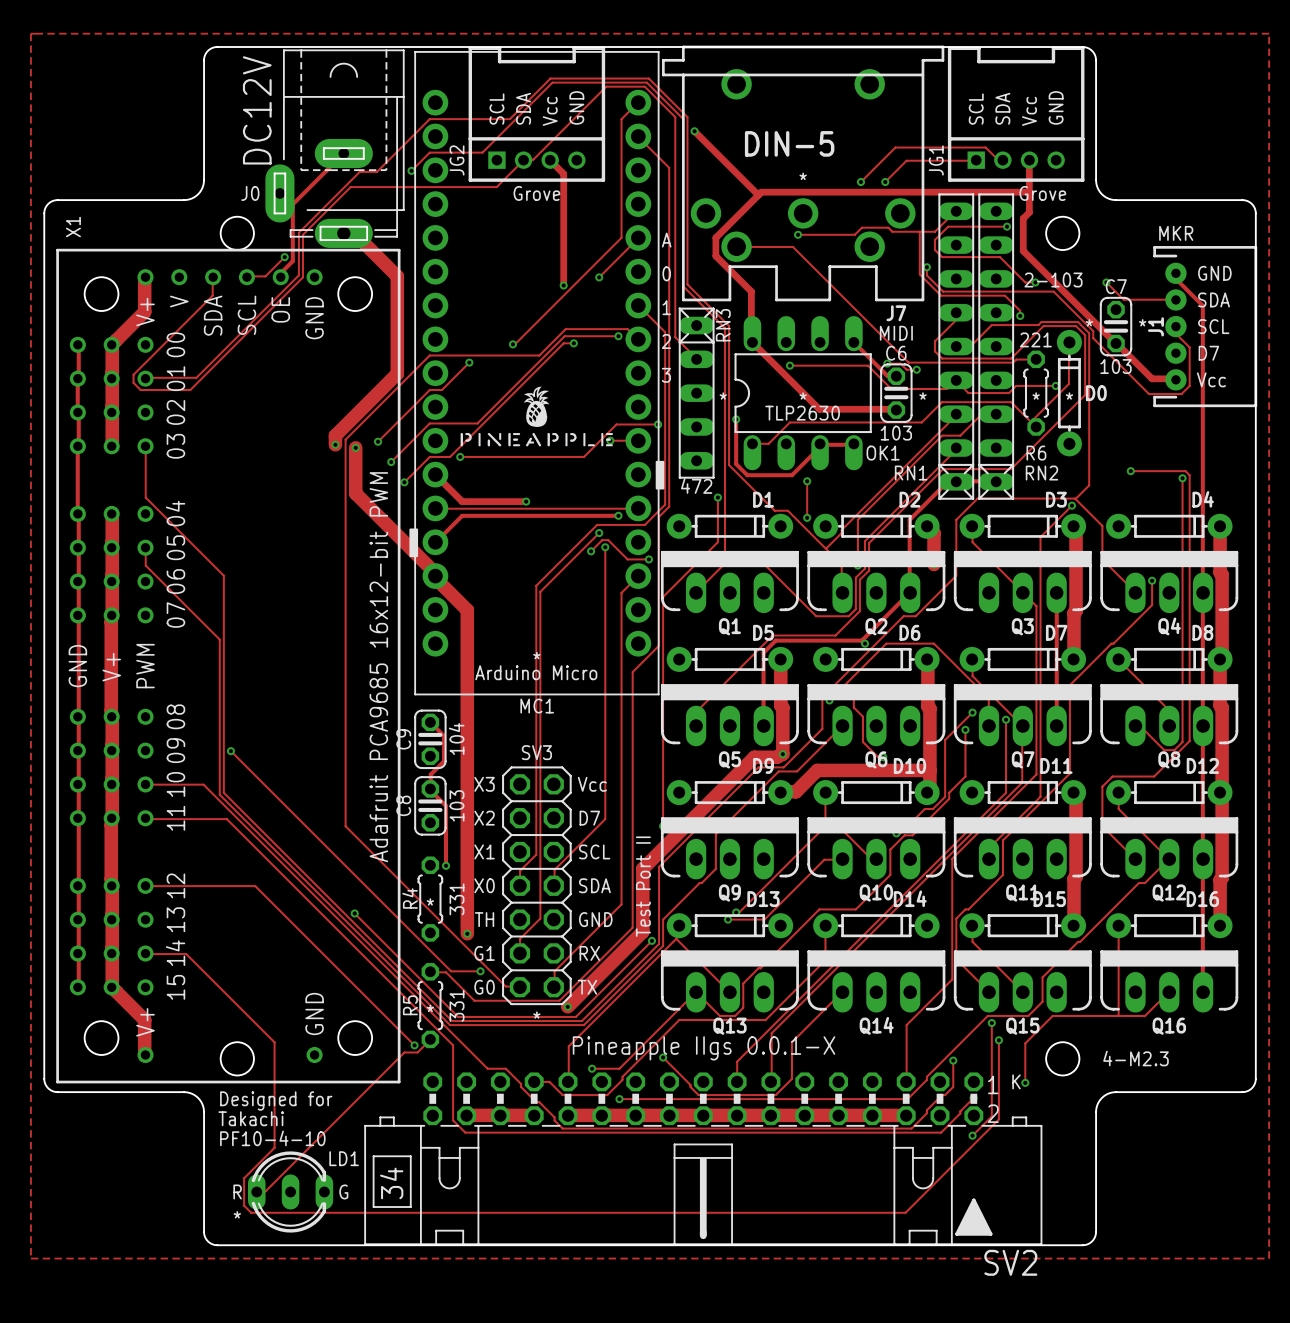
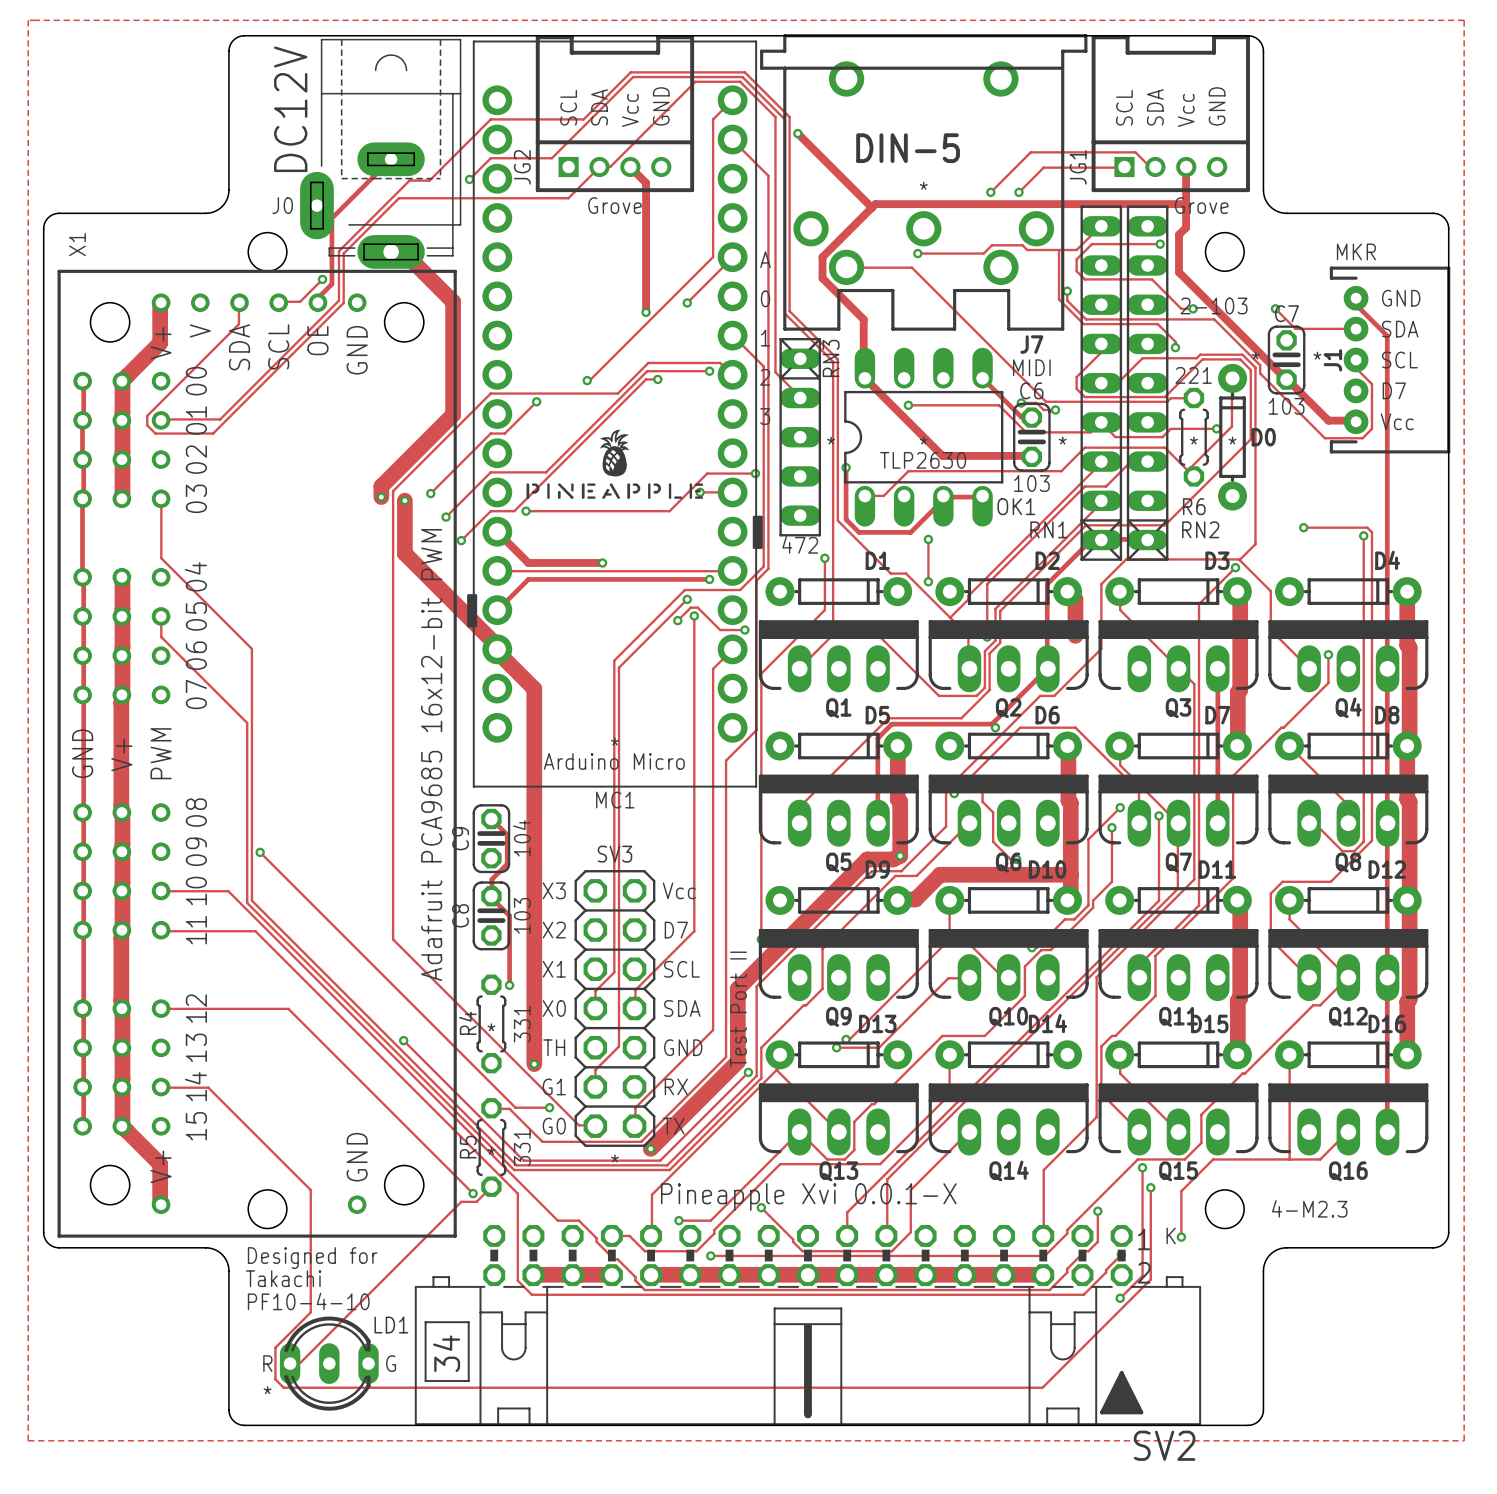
text: Pineapple IIgs 0.0.1-X (704, 1048) -> Pineapple Xvi 0.0.1-X (808, 1197)

